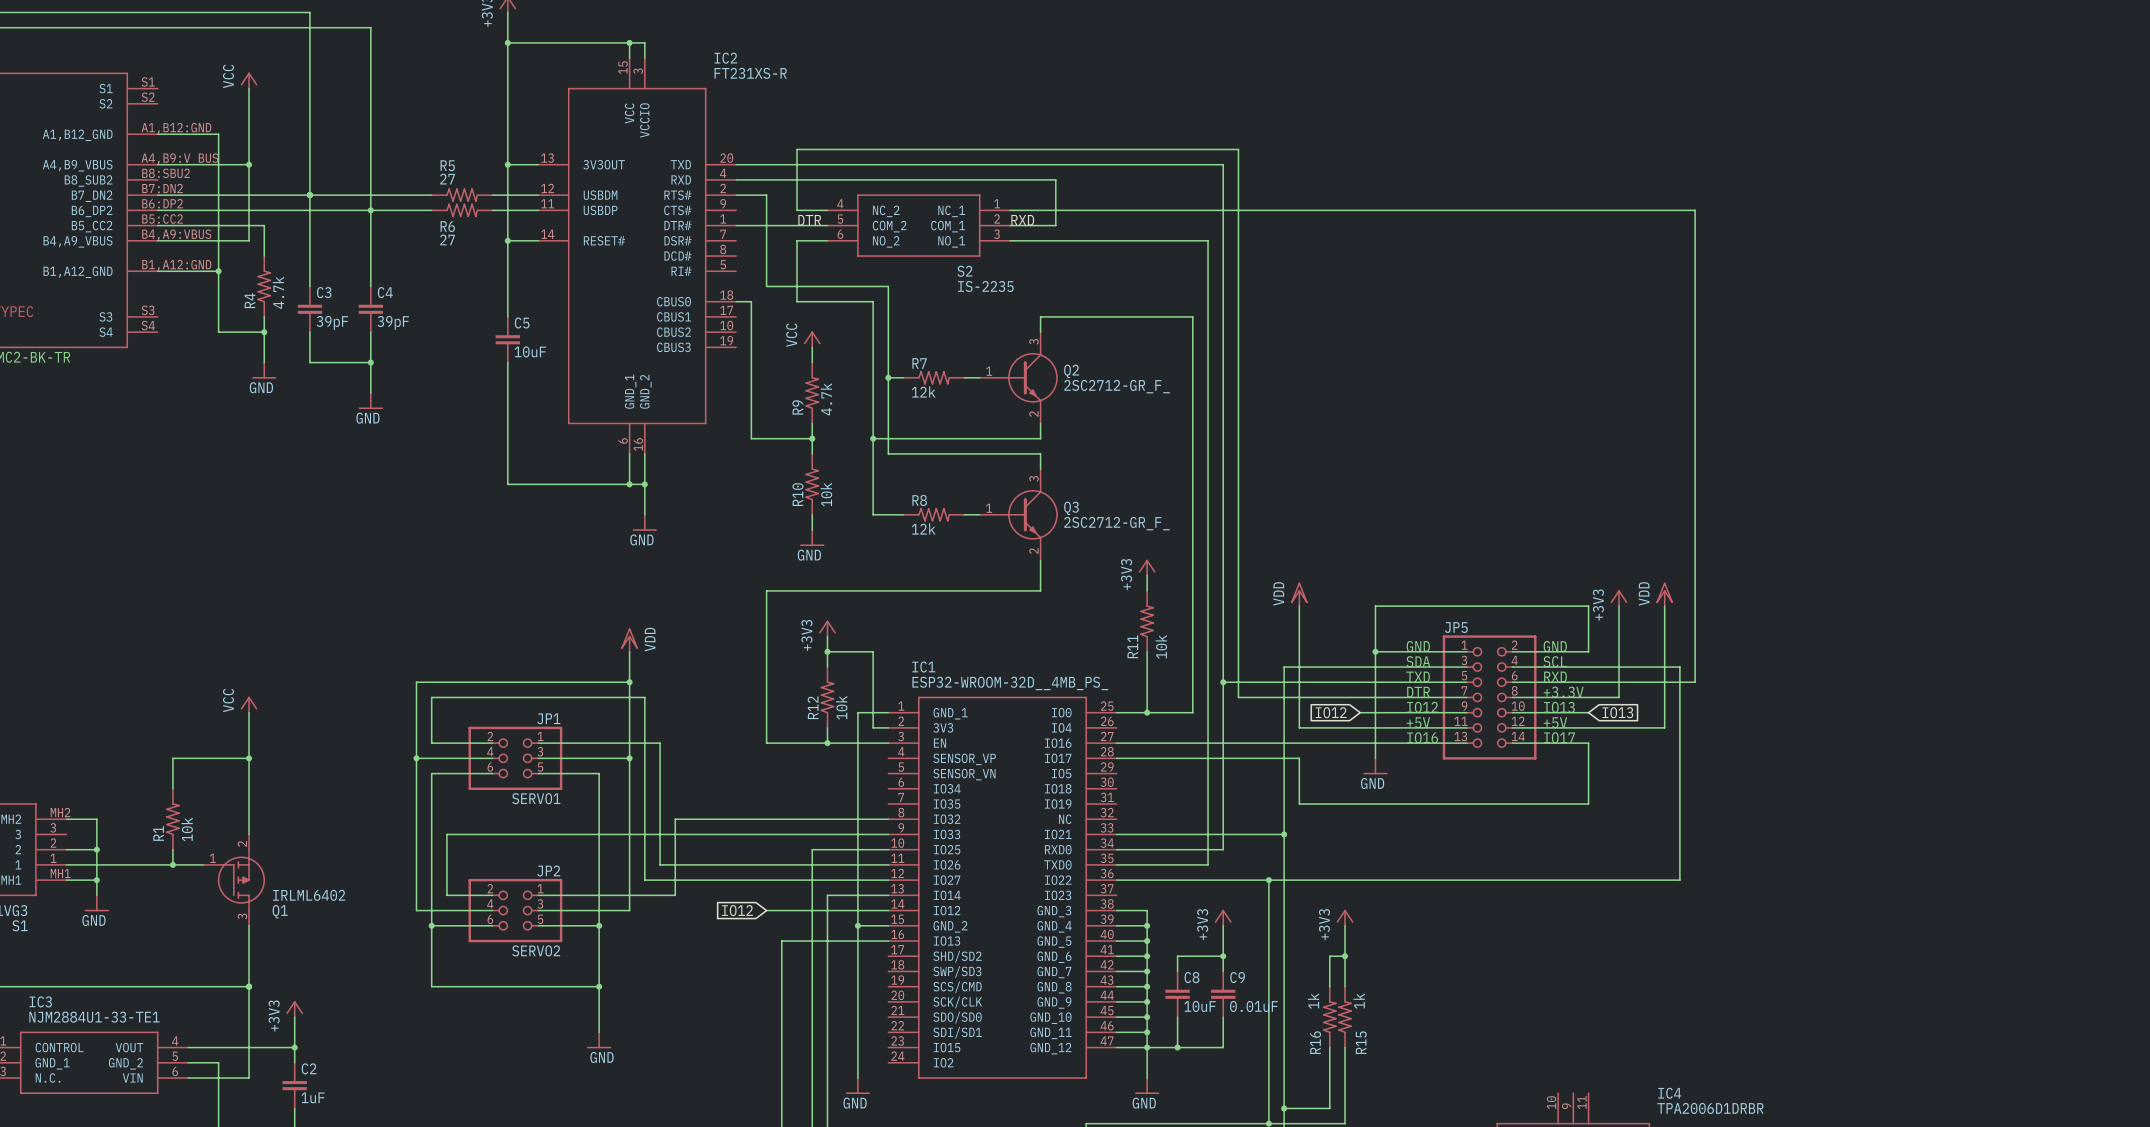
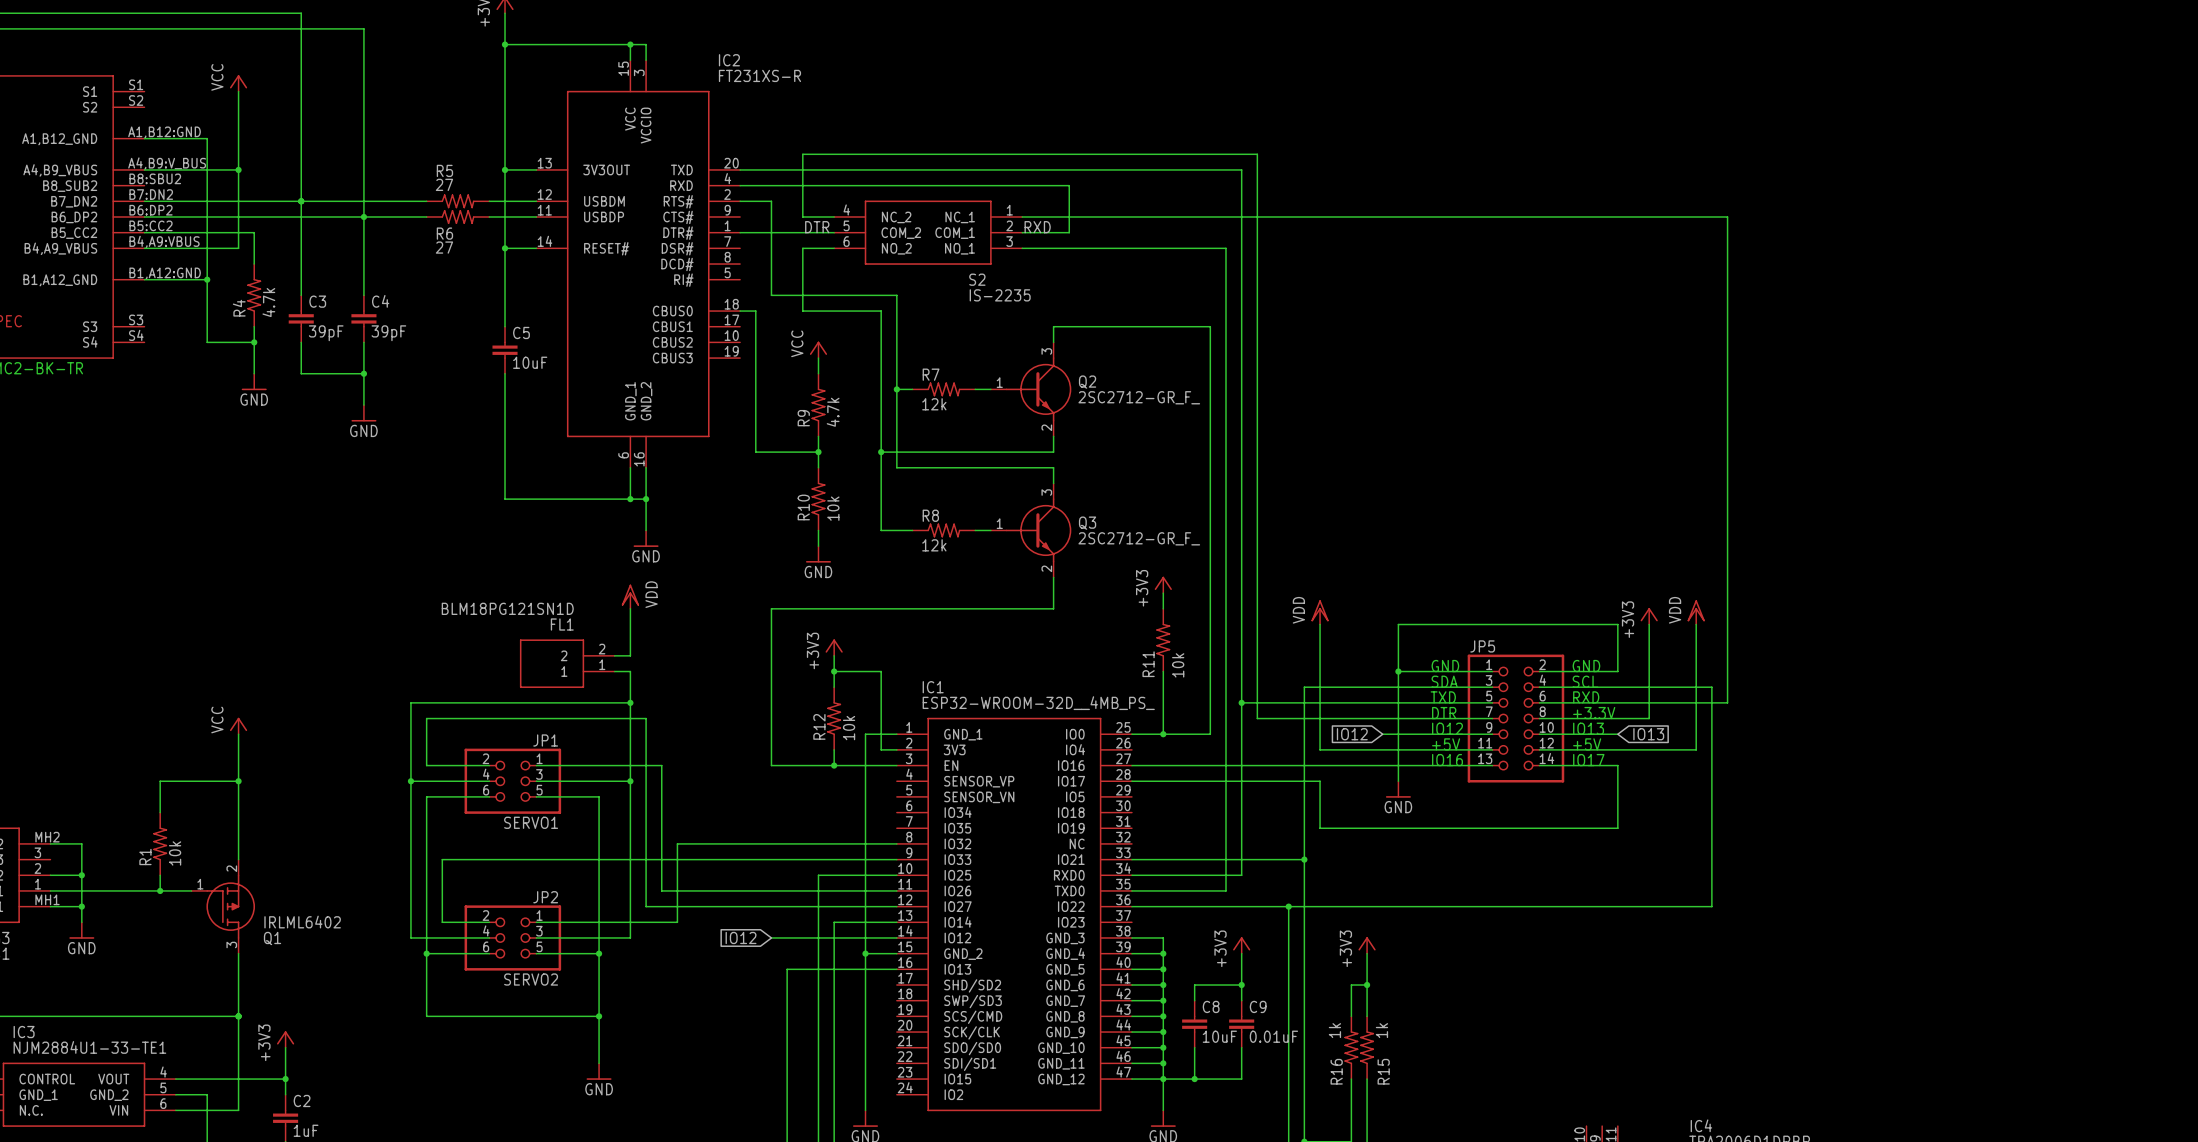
wire: none -> (630, 608) (630, 655) (614, 655)
power symbol position: VDD (629, 640) -> VDD (630, 596)
FL1: none -> BLM18PG121SN1D (567, 663)
wire: none -> (614, 671) (630, 671)

